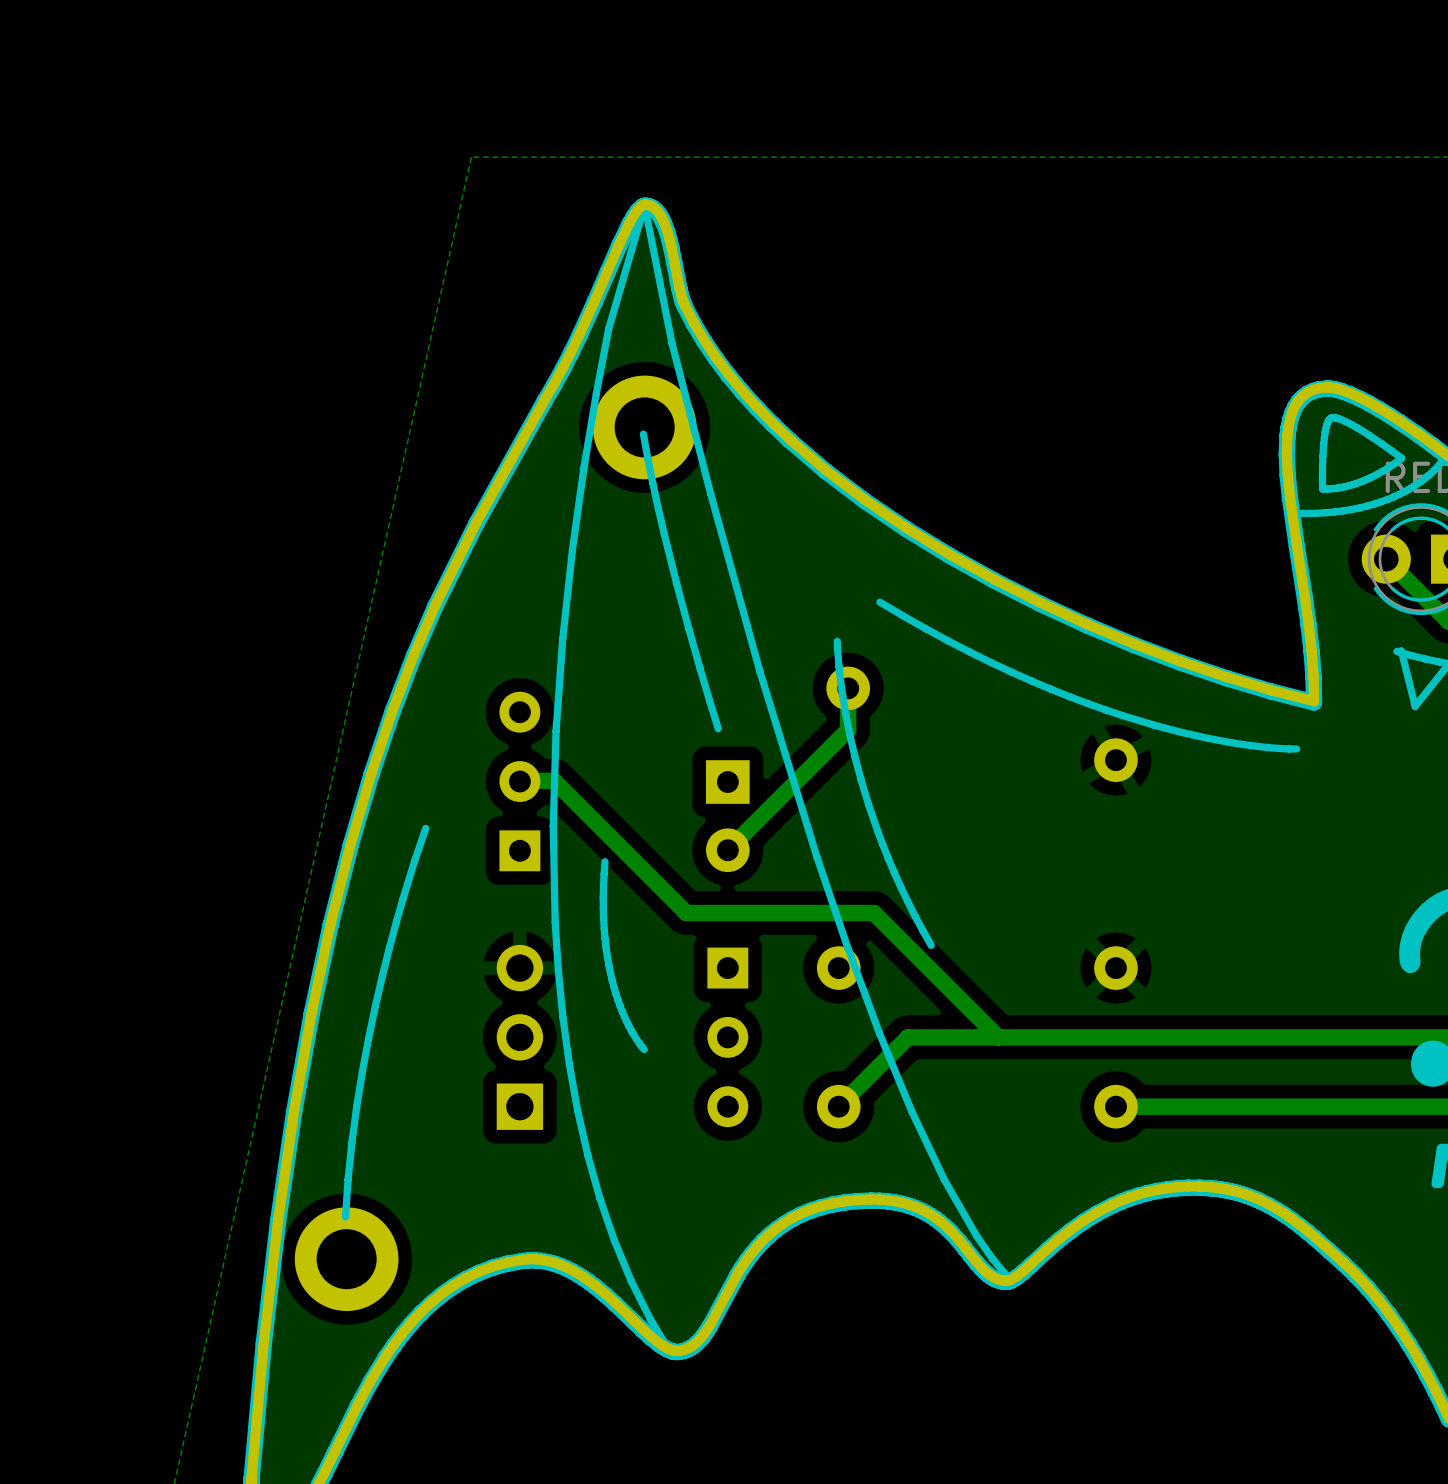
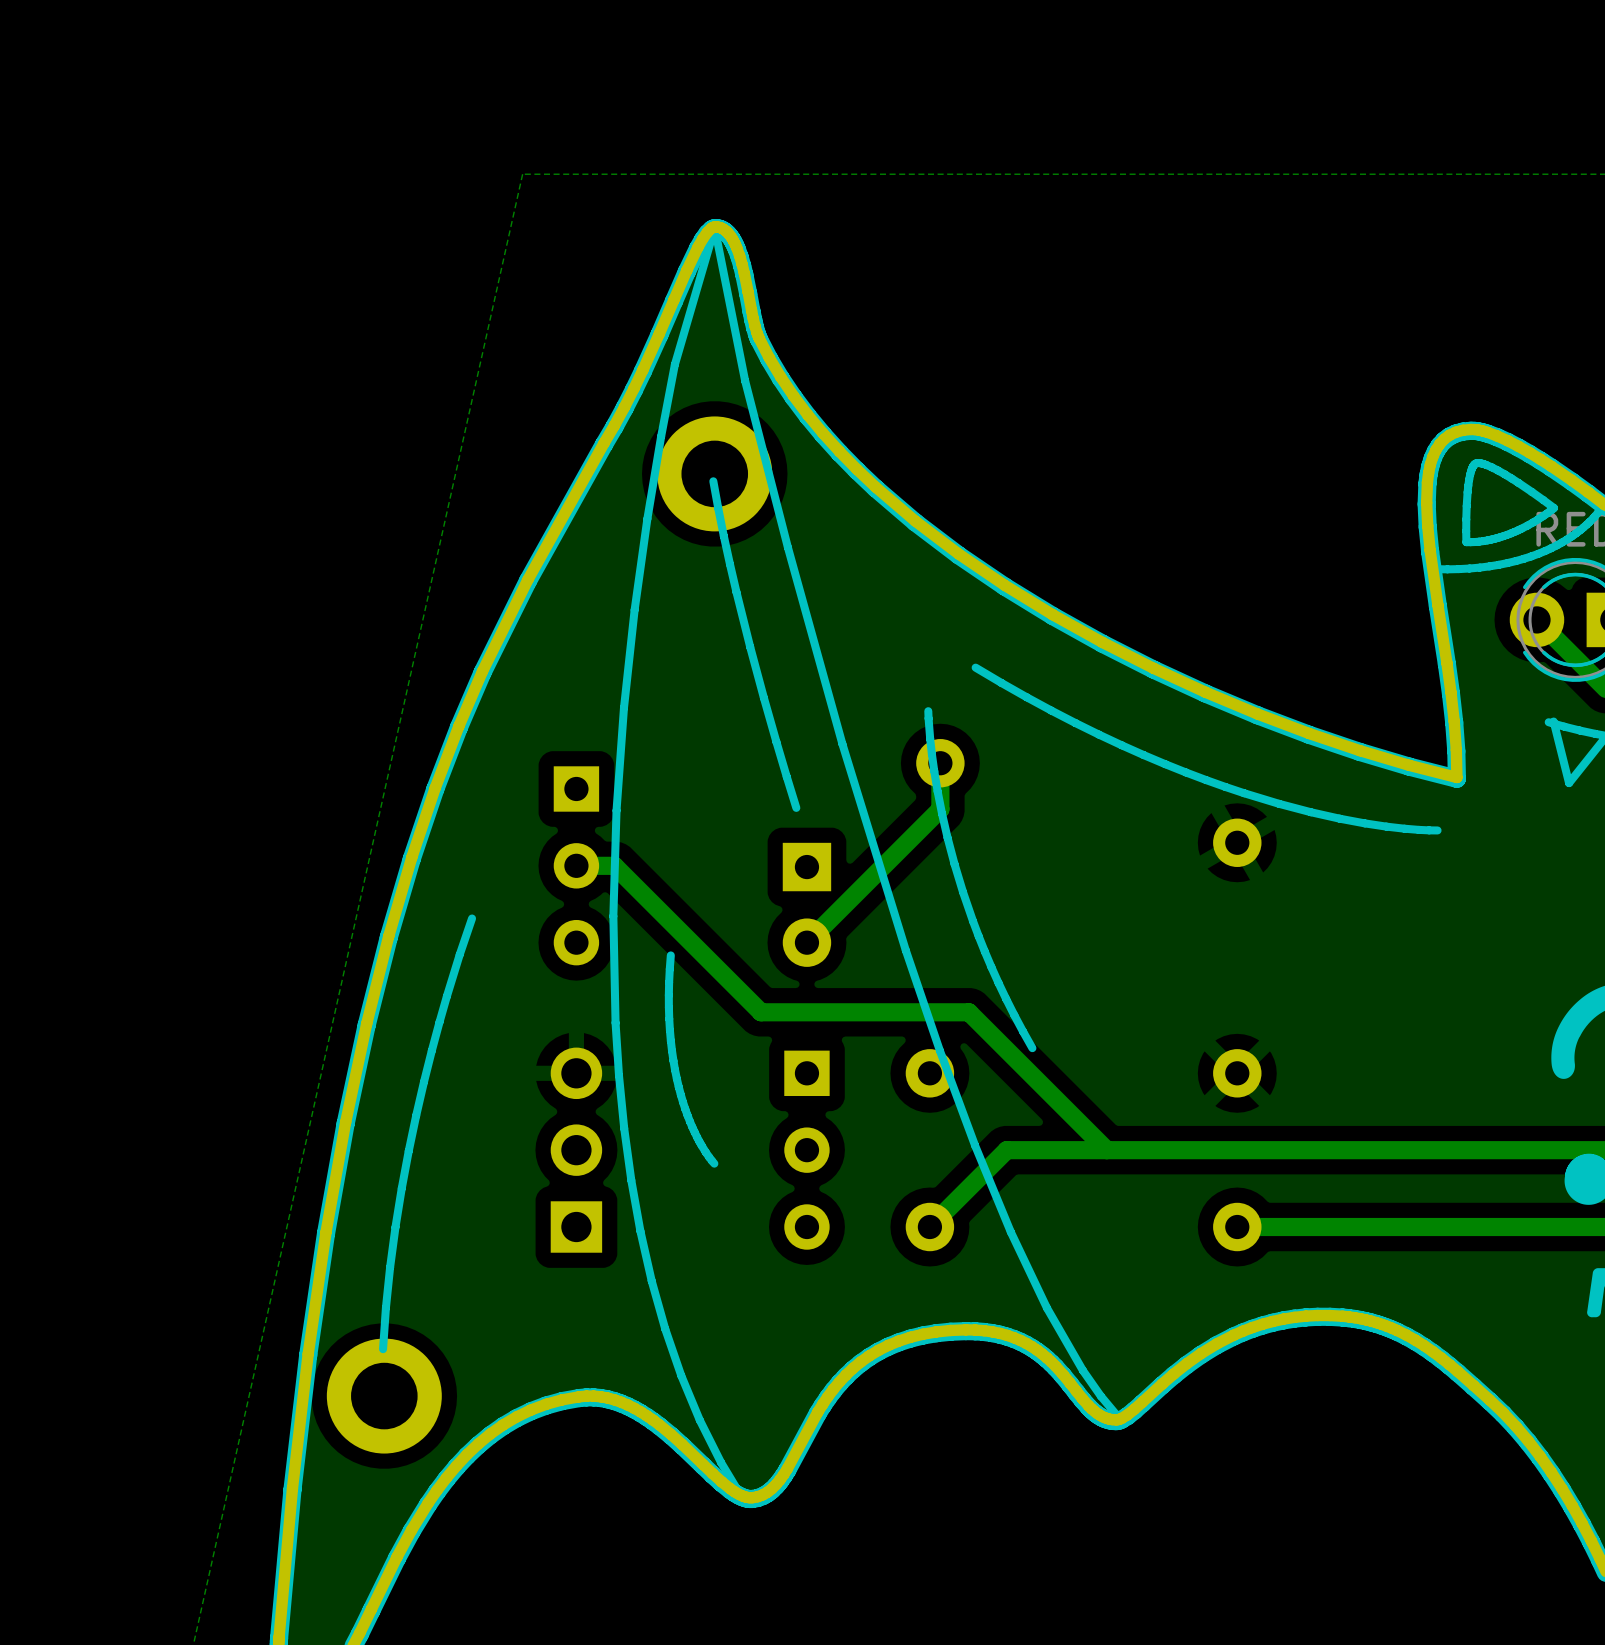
part rotation: 0° (519, 781) -> 180° (576, 865)

